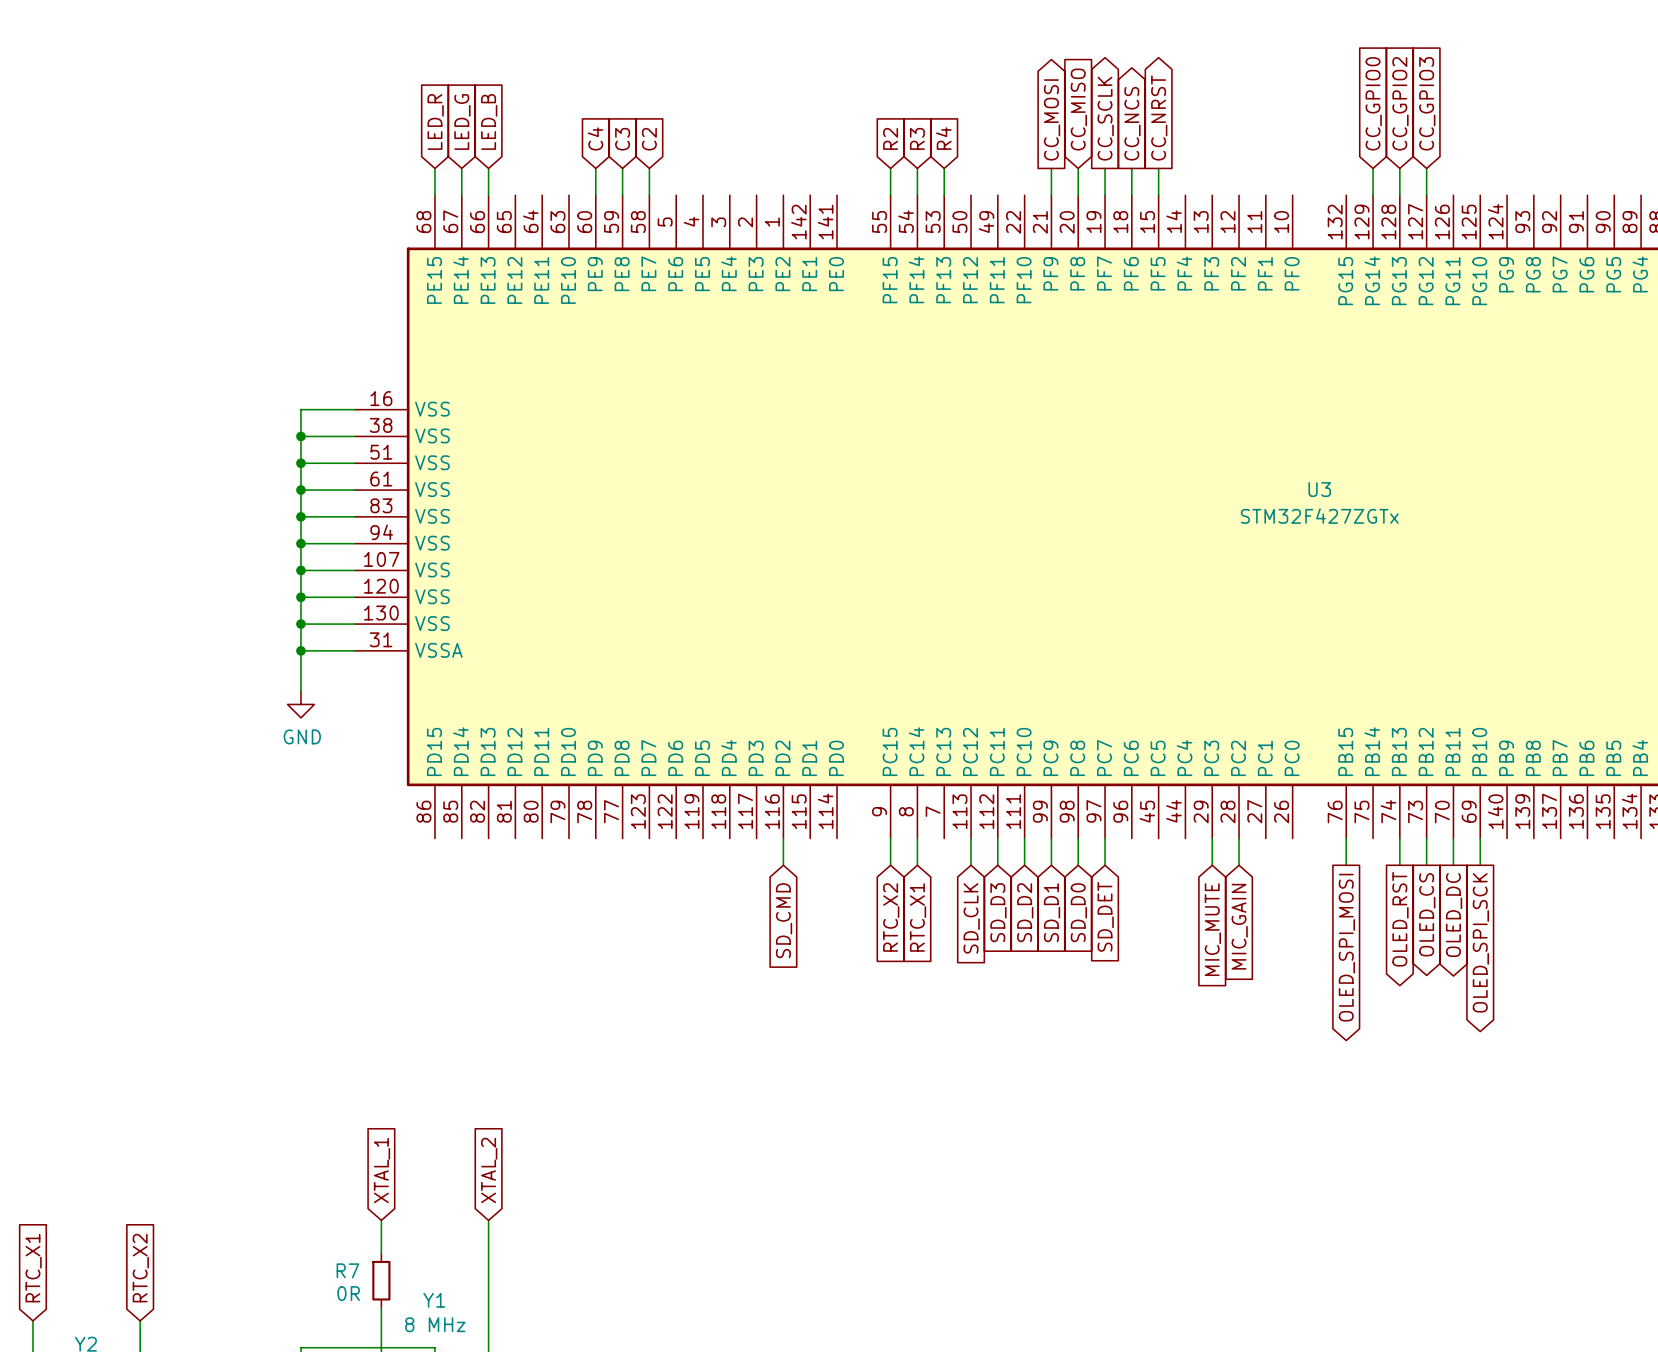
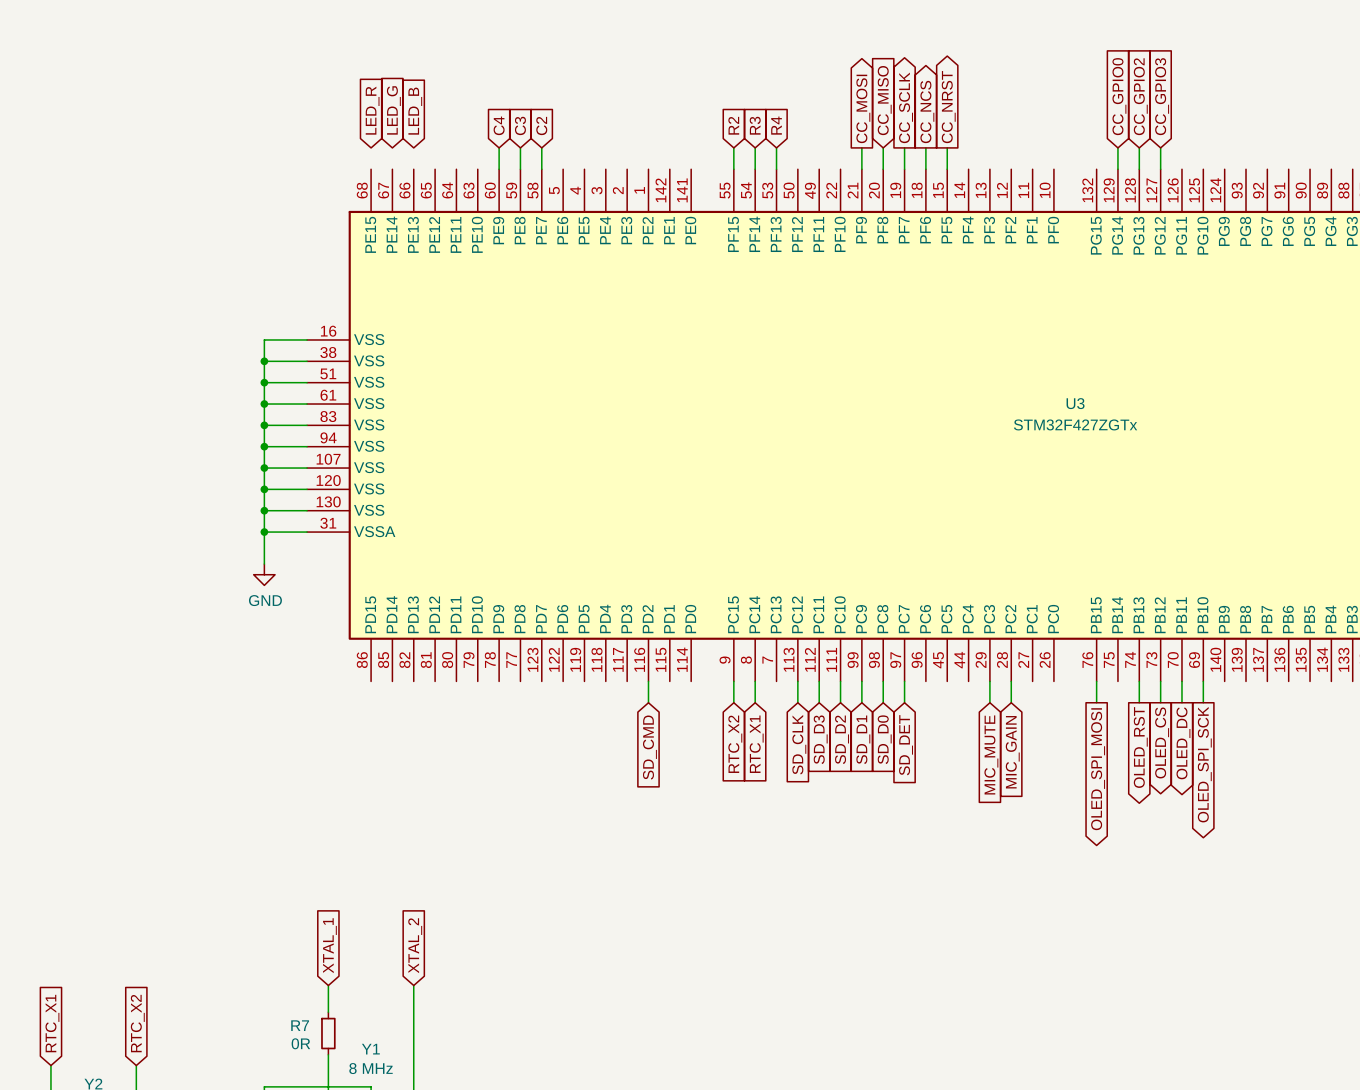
wire: (434, 168) (434, 195) -> none
wire: (461, 168) (461, 195) -> none
wire: (488, 168) (488, 195) -> none

